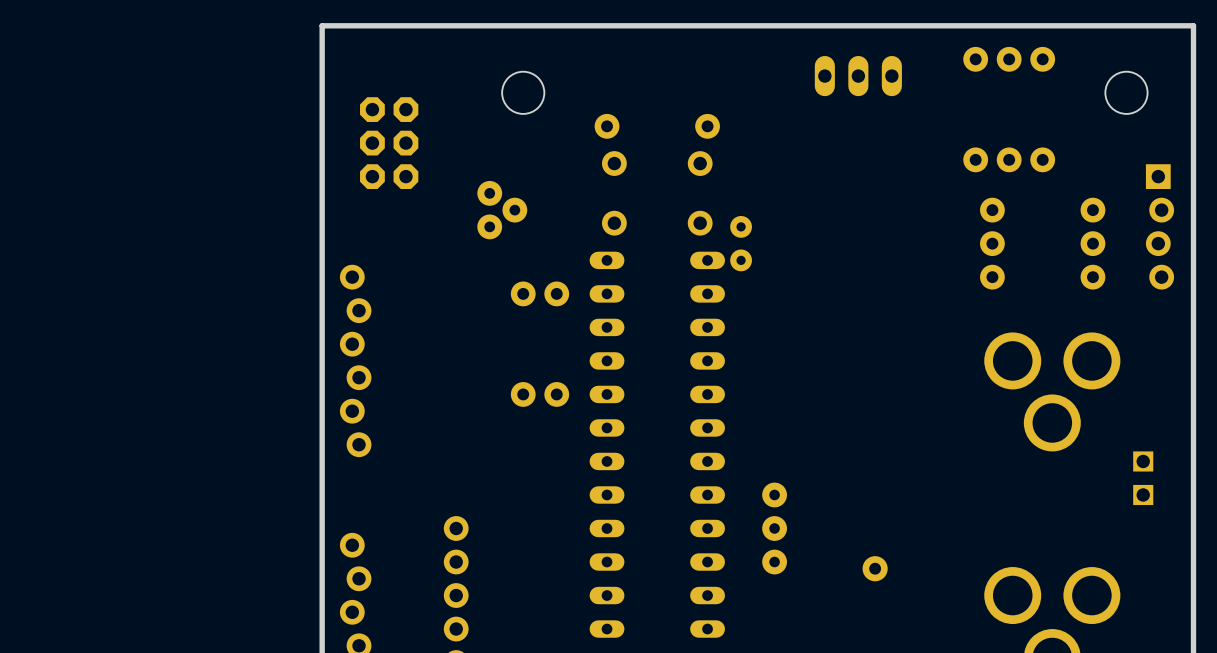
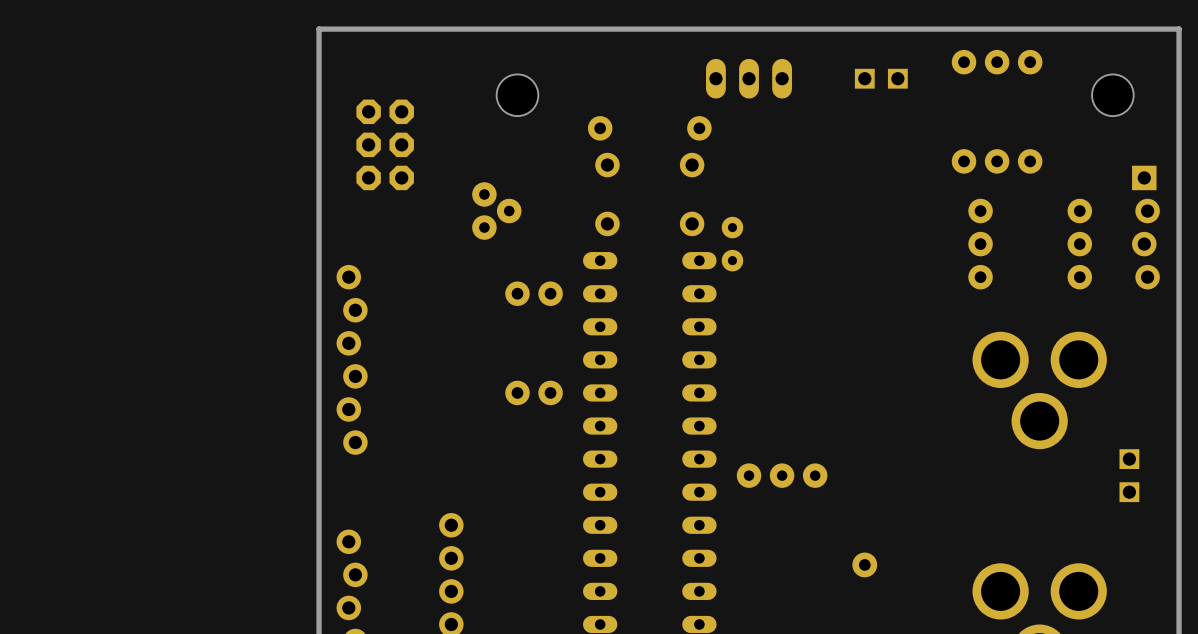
part position: (858, 76) -> (749, 78)
part: none -> (881, 78)
part rotation: 0° (774, 528) -> 90° clockwise (782, 475)

